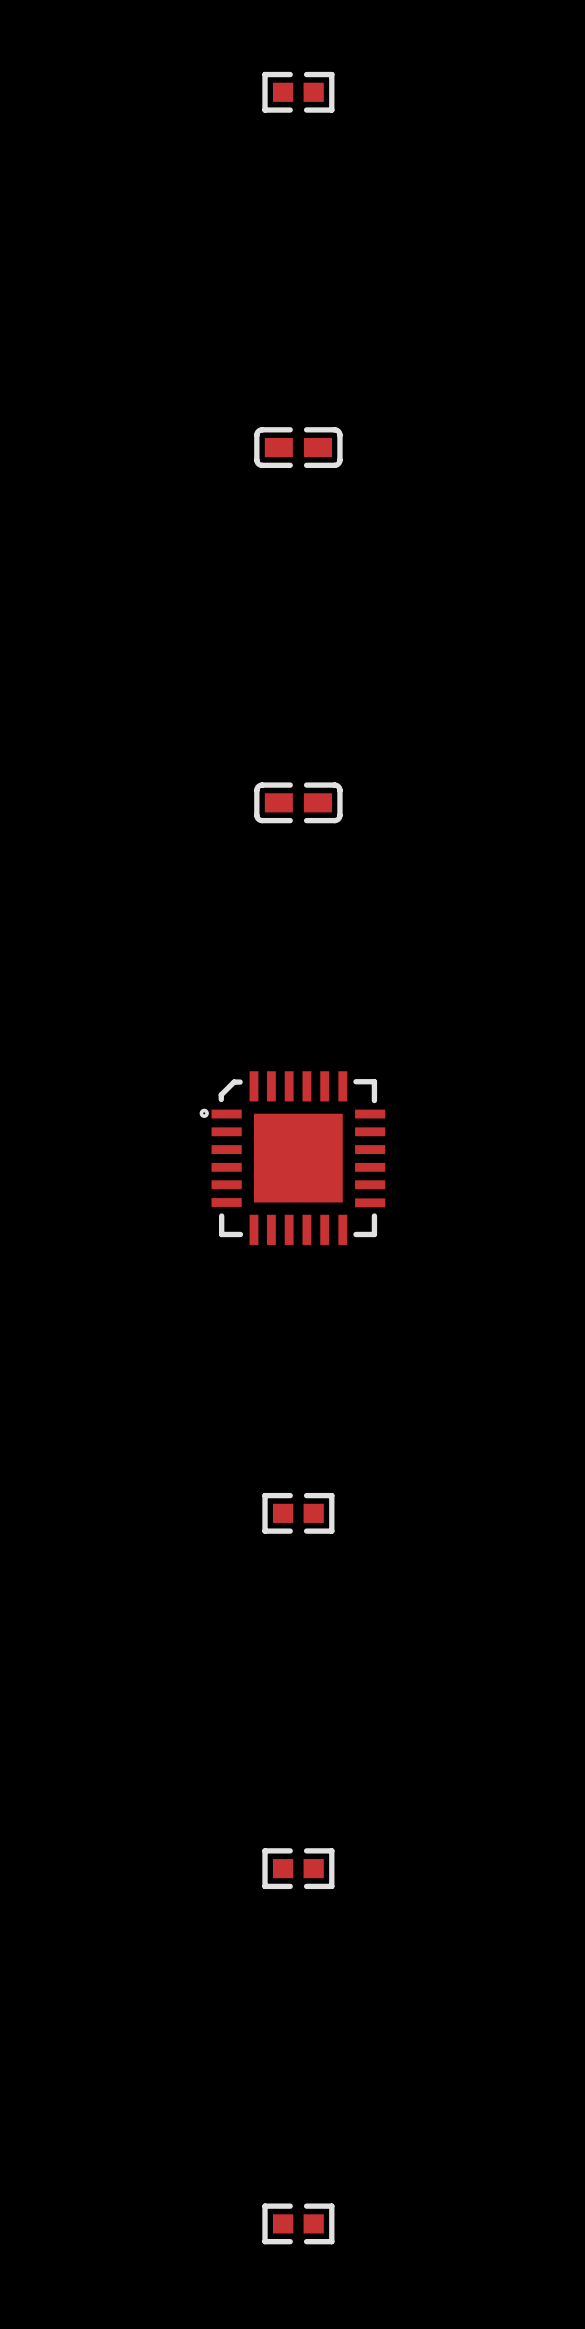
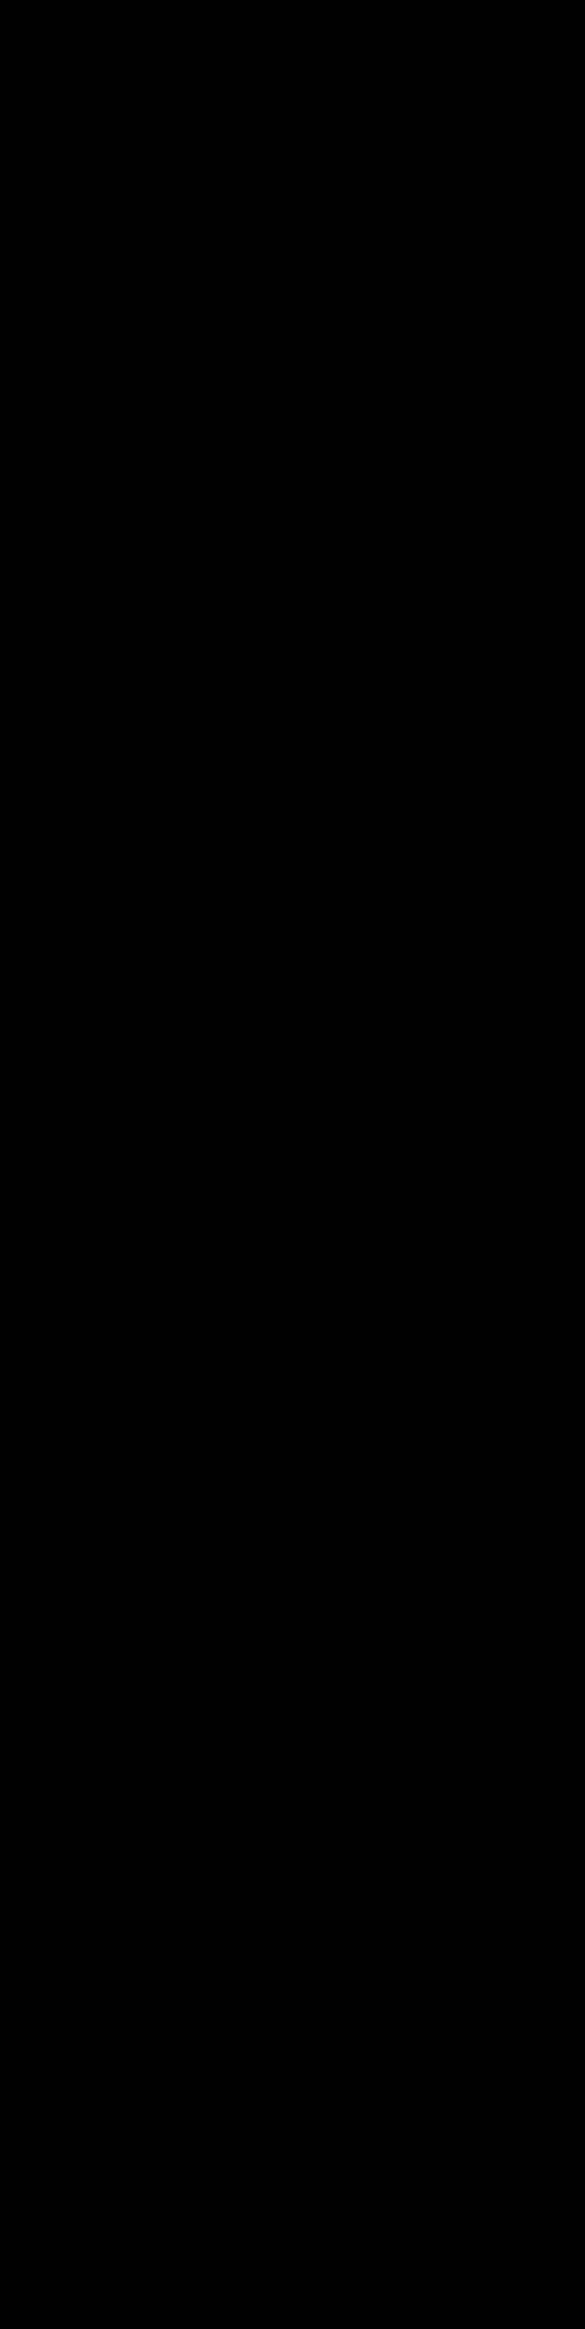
part: (298, 92) -> none
part: (298, 447) -> none
part: (298, 802) -> none
part: (292, 1158) -> none
part: (298, 1513) -> none
part: (298, 1868) -> none
part: (298, 2223) -> none

